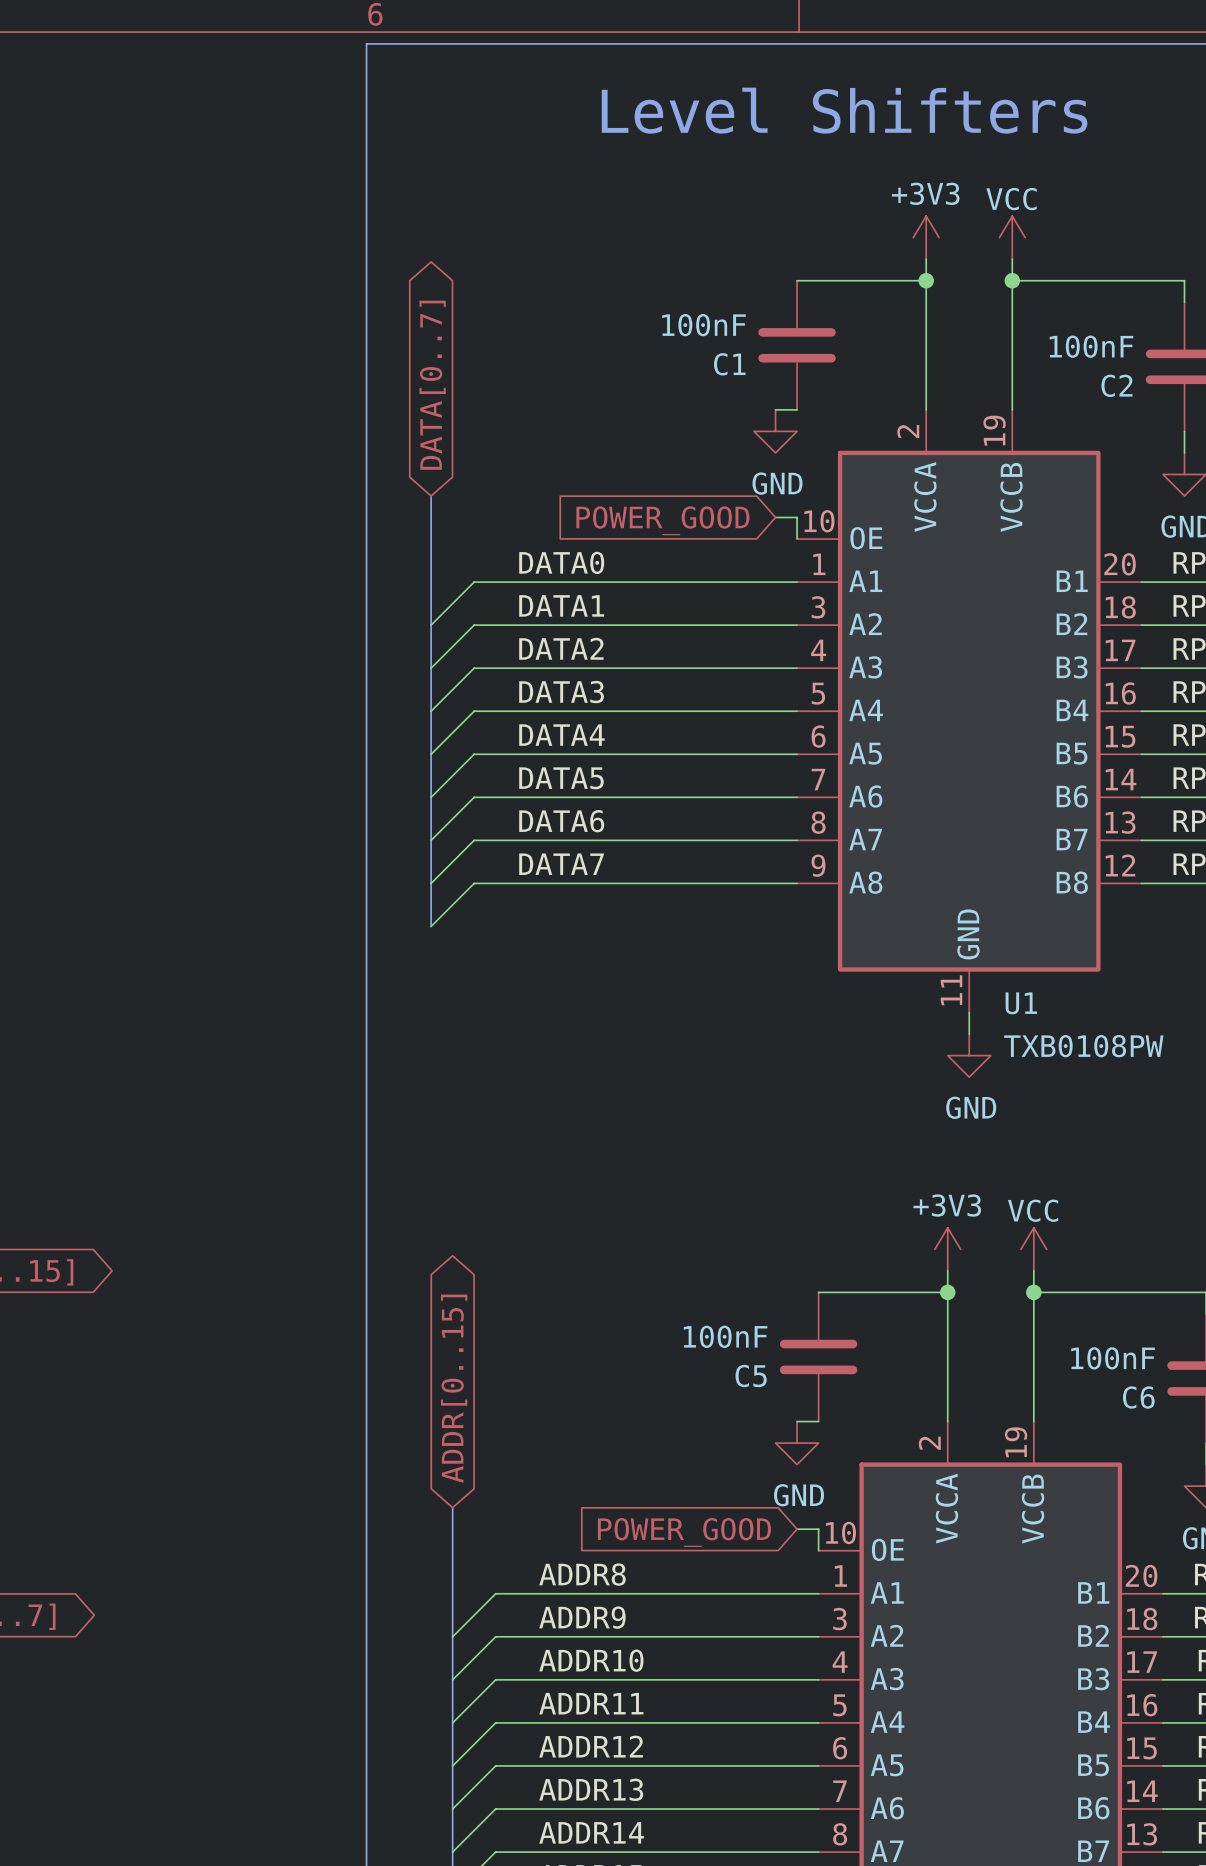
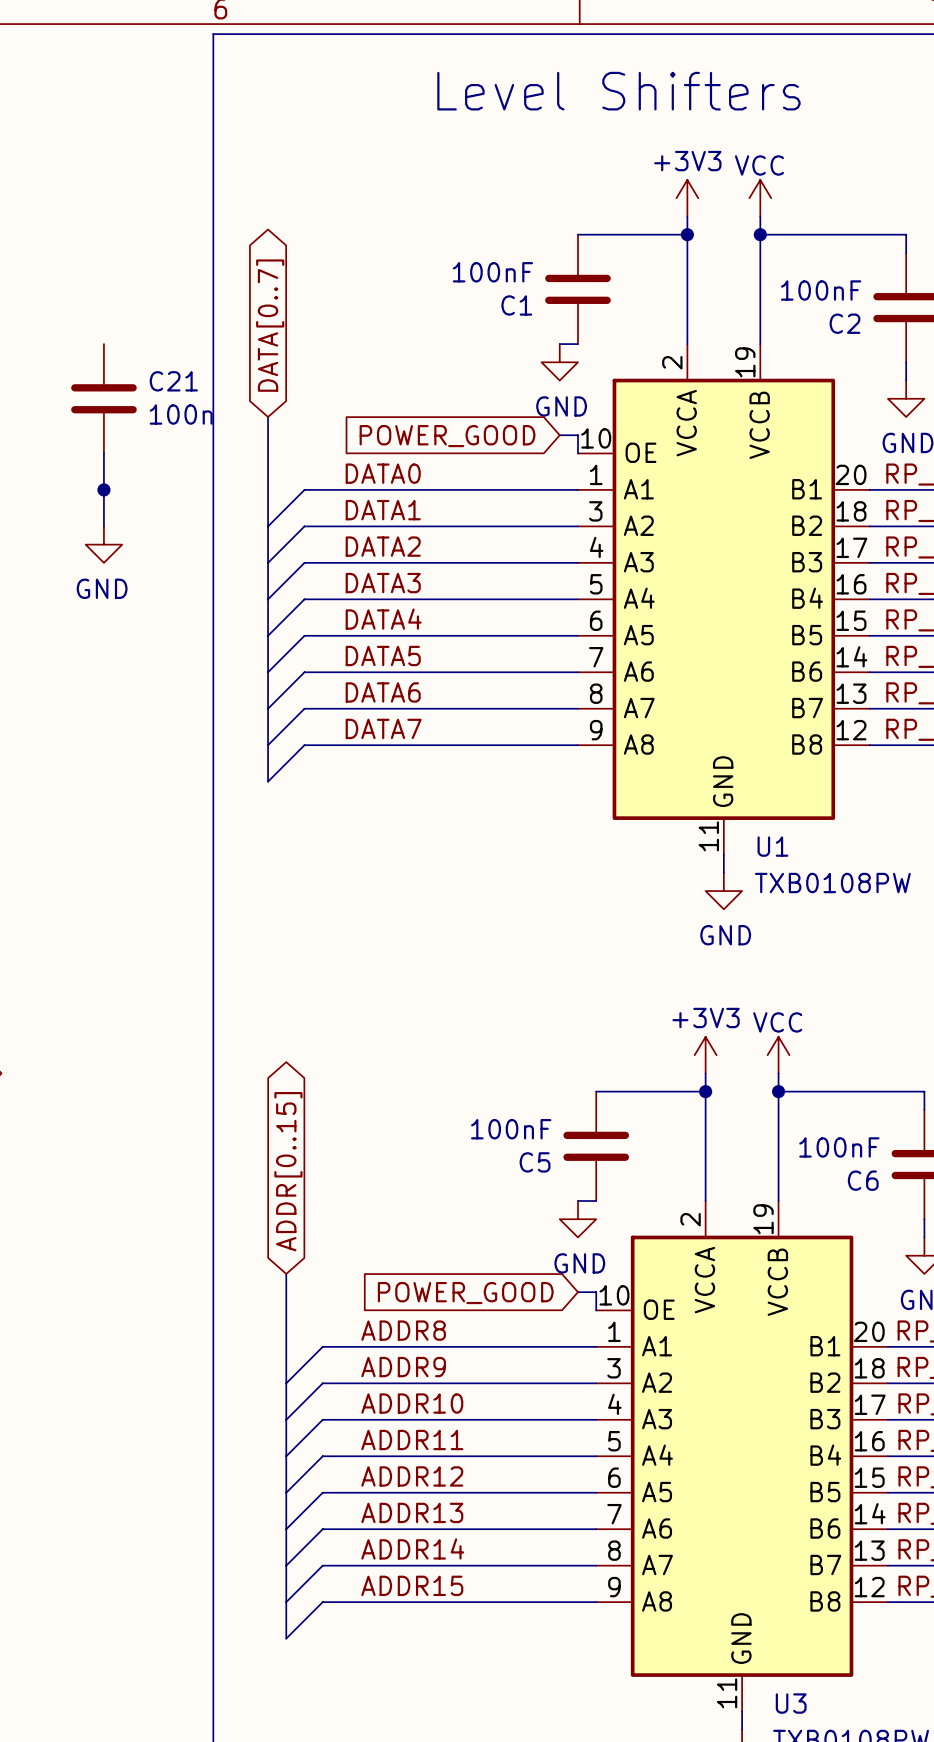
C21: none -> 100n (103, 398)
wire: none -> (103, 453) (103, 526)
junction: none -> (103, 489)
power symbol: none -> GND (103, 544)

